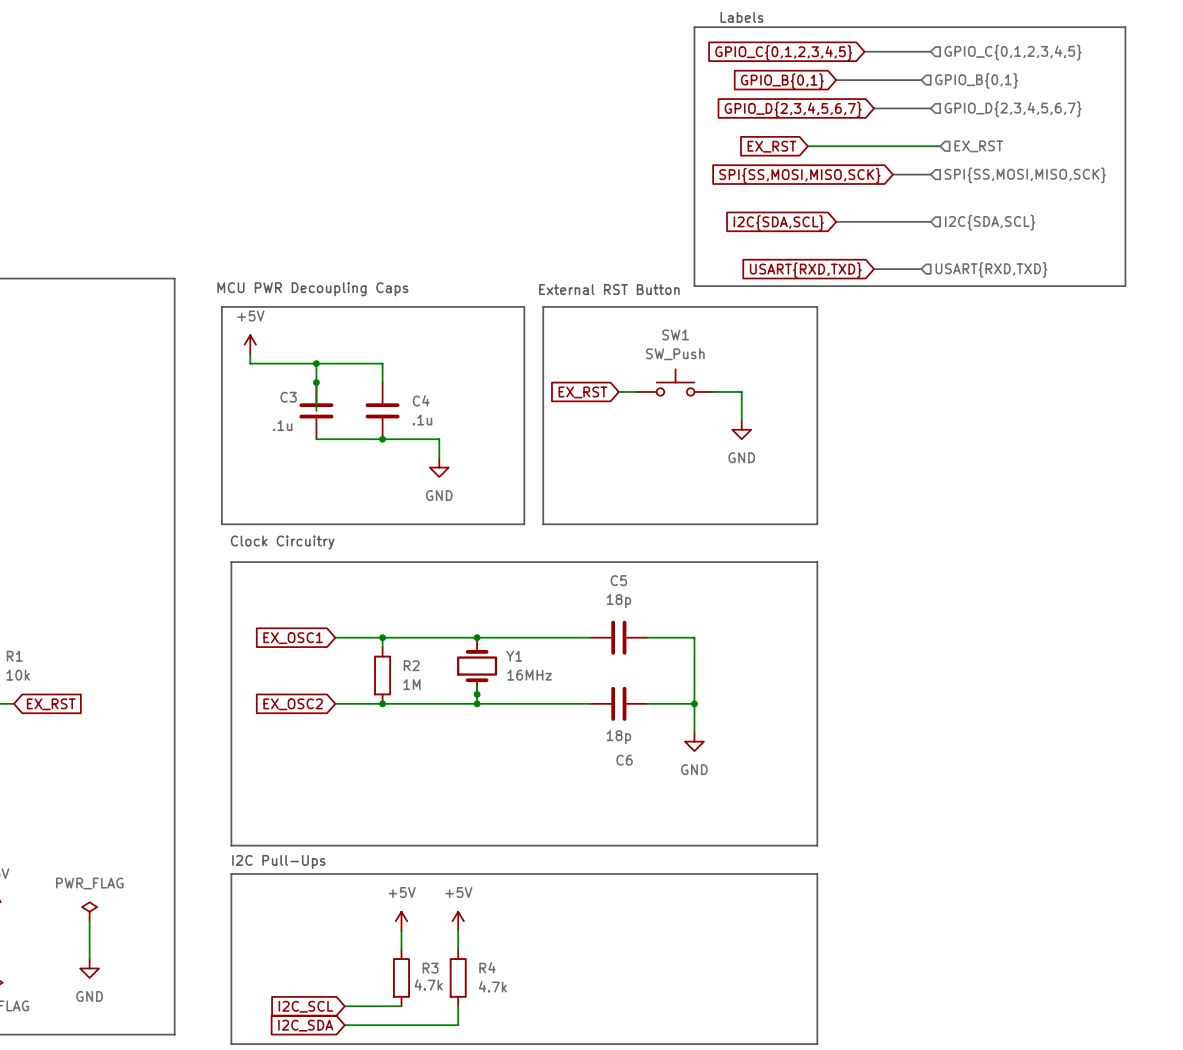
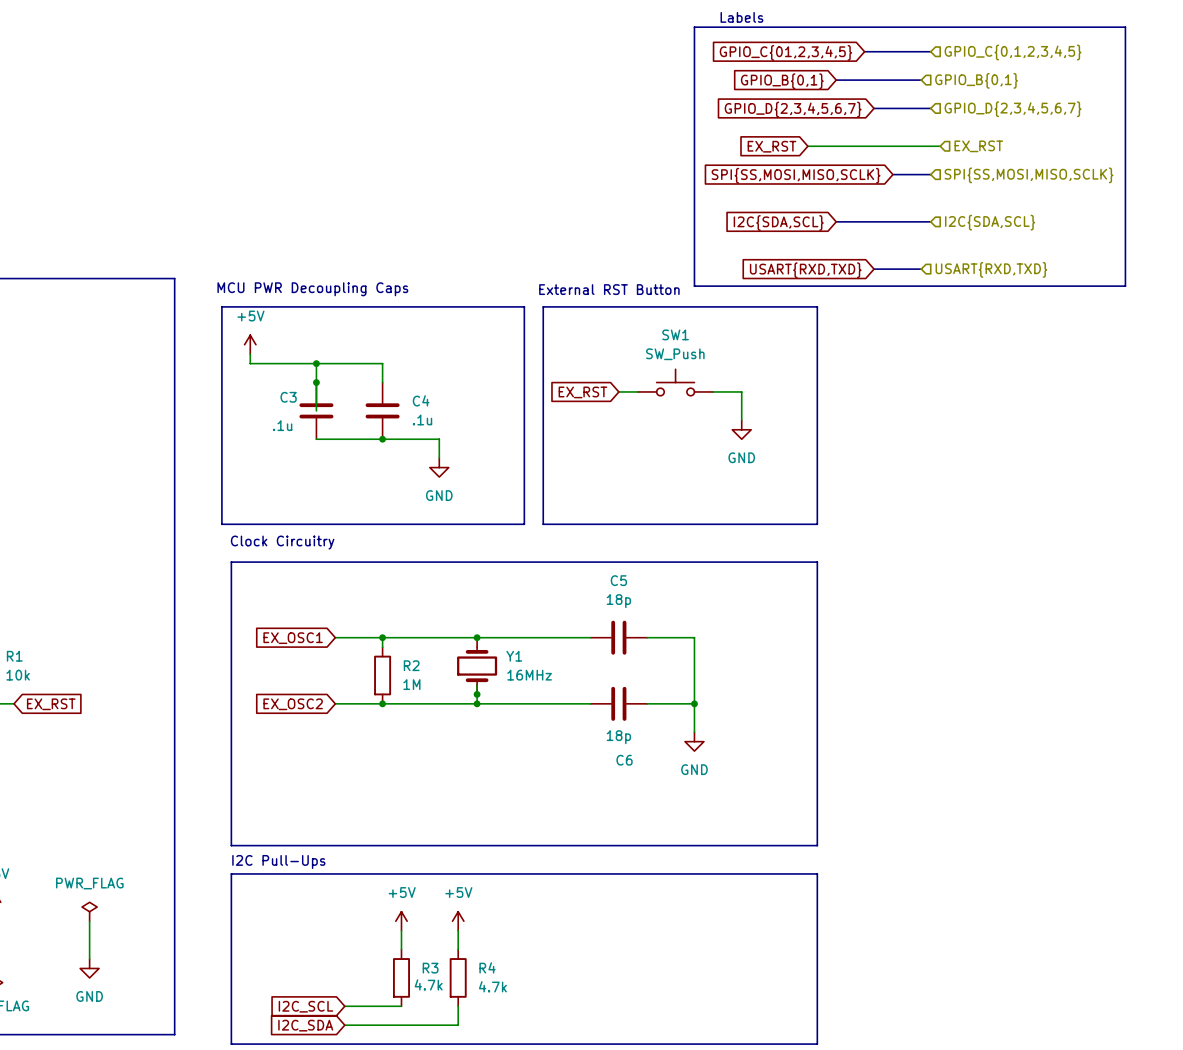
global label: GPIO_C{0,1,2,3,4,5} (783, 52) -> GPIO_C{01,2,3,4,5} (785, 52)
global label: SPI{SS,MOSI,MISO,SCK} (799, 175) -> SPI{SS,MOSI,MISO,SCLK} (796, 175)
hierarchical label: SPI{SS,MOSI,MISO,SCK} (1025, 175) -> SPI{SS,MOSI,MISO,SCLK} (1028, 175)

